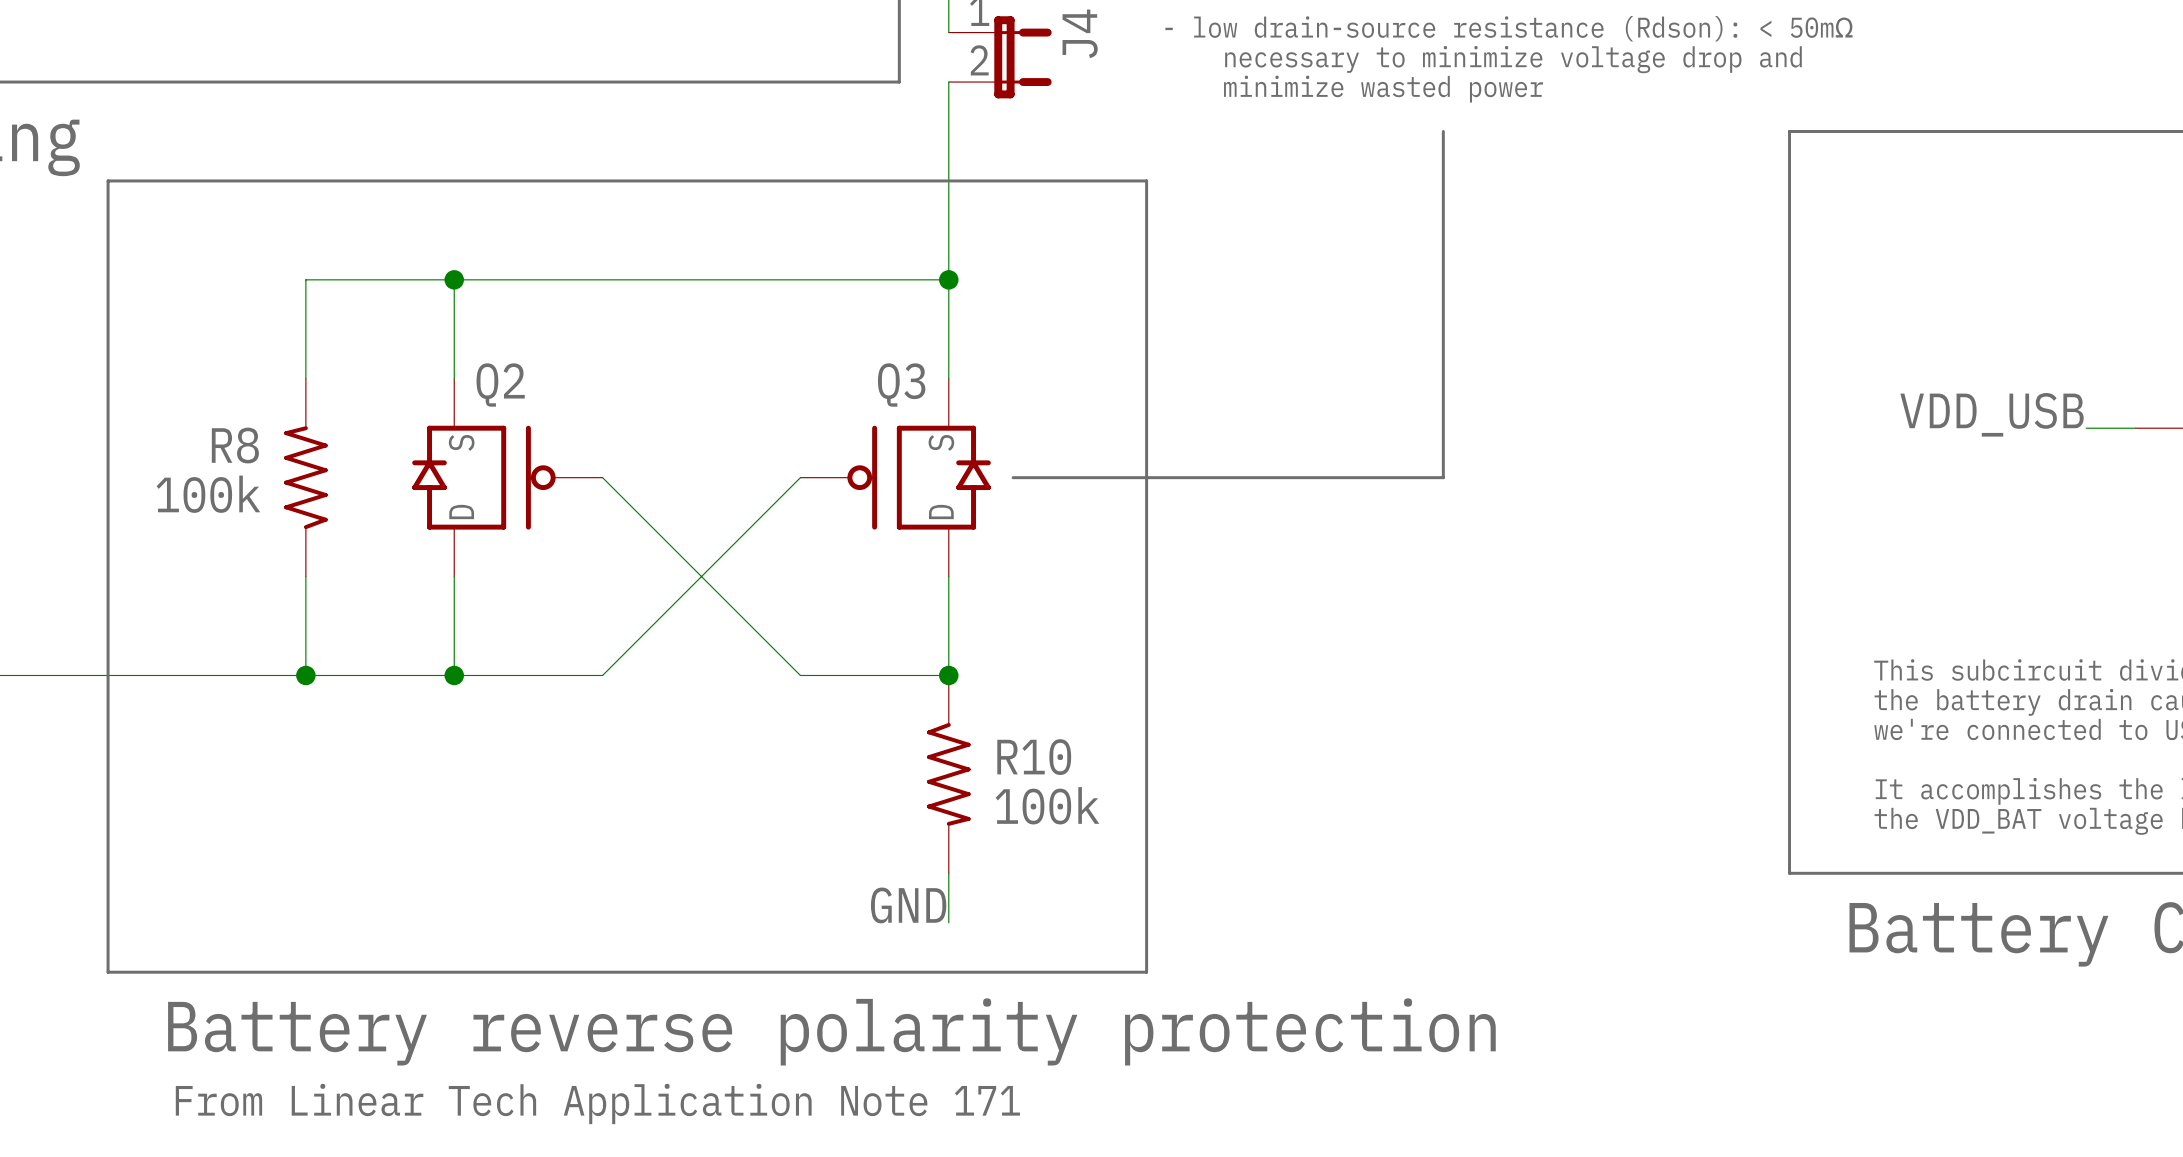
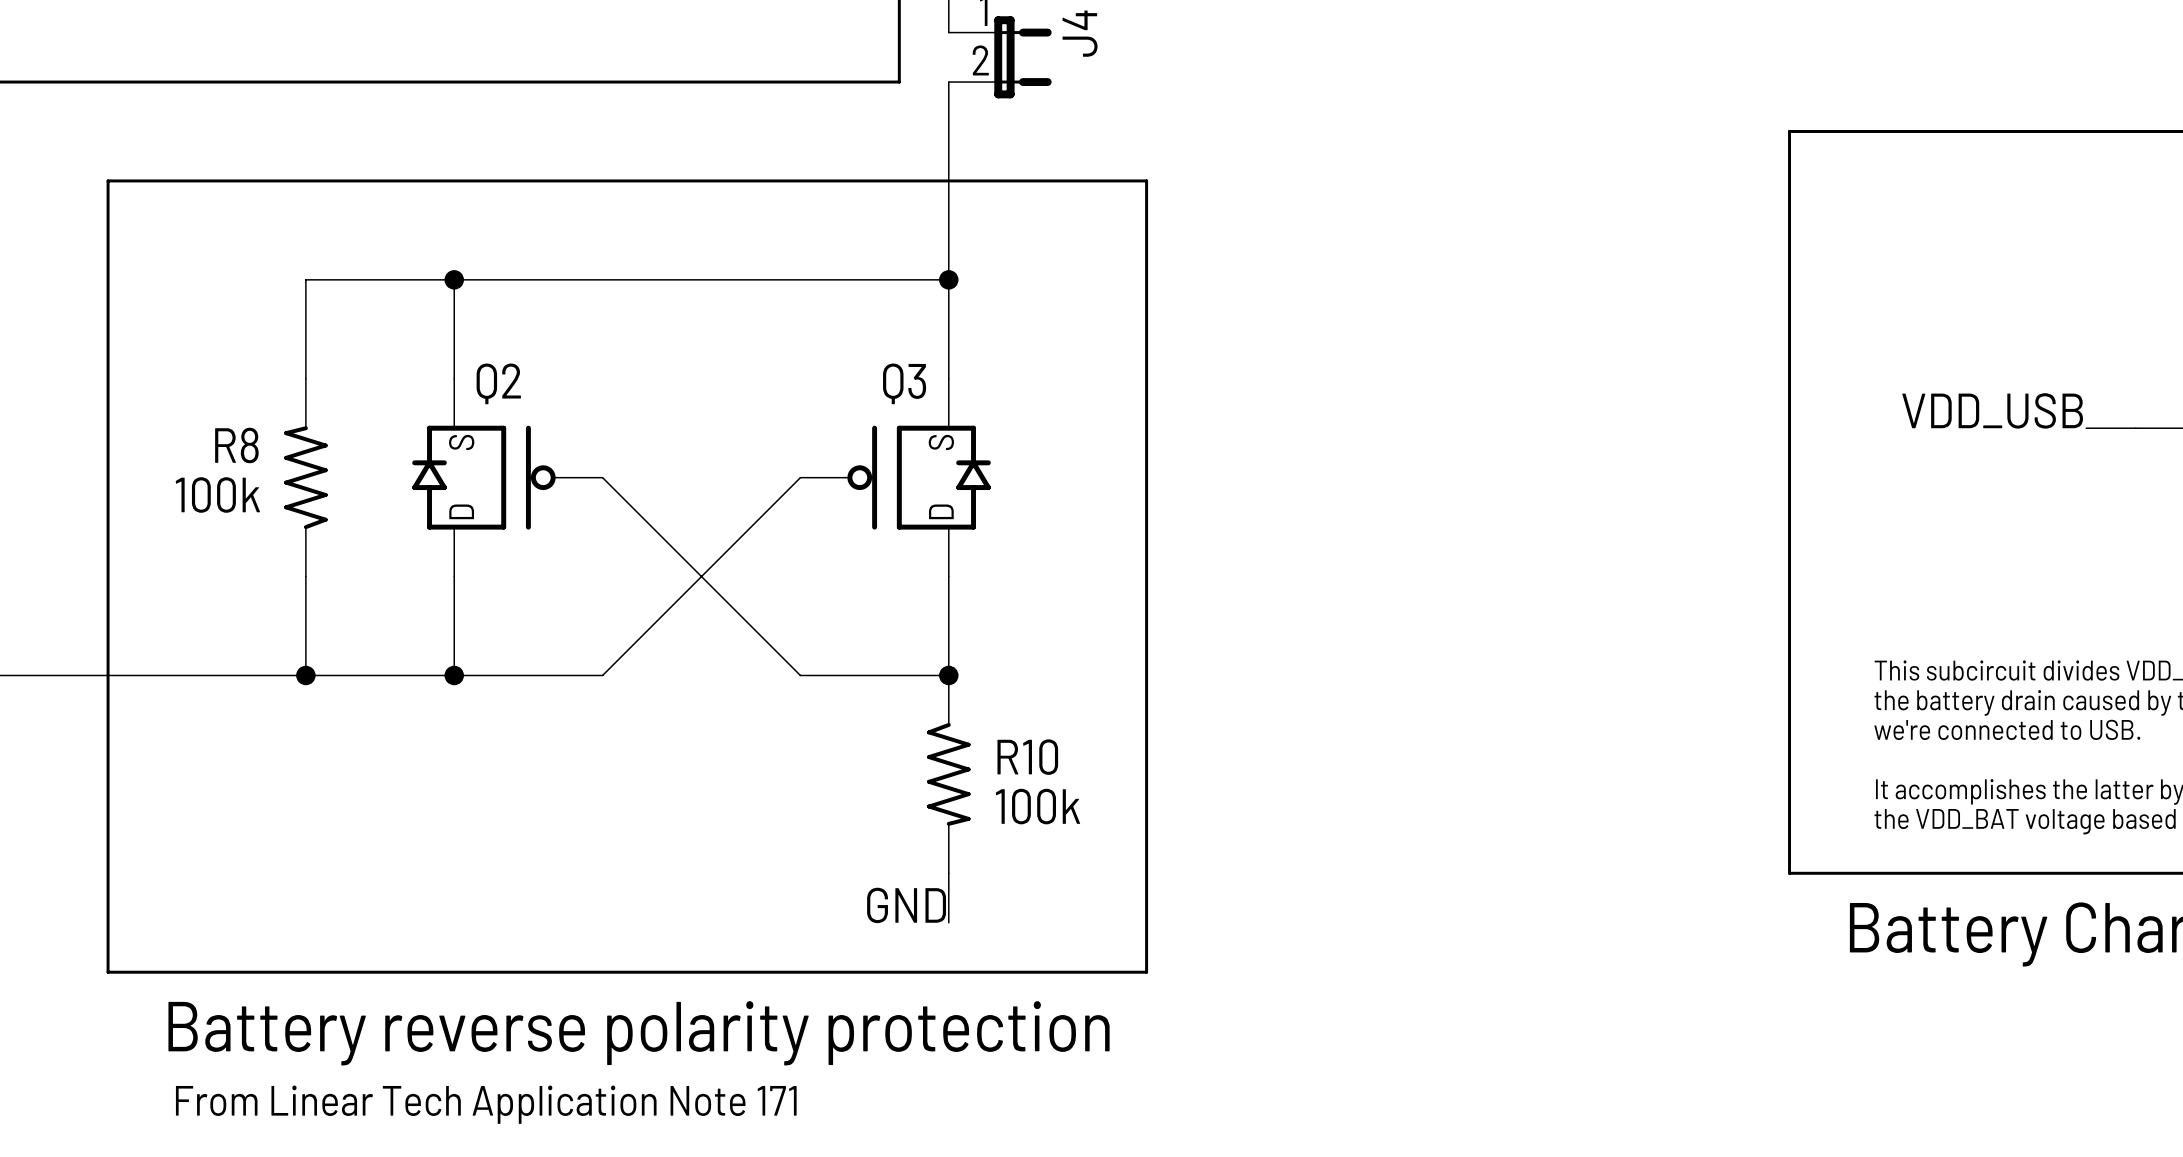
text: - low drain-source resistance (Rdson): < 50mΩ (1508, 28) -> none
text: necessary to minimize voltage drop and (1513, 59) -> none
text: minimize wasted power (1383, 89) -> none
line: (1443, 131) (1443, 477) (1013, 477) -> none

